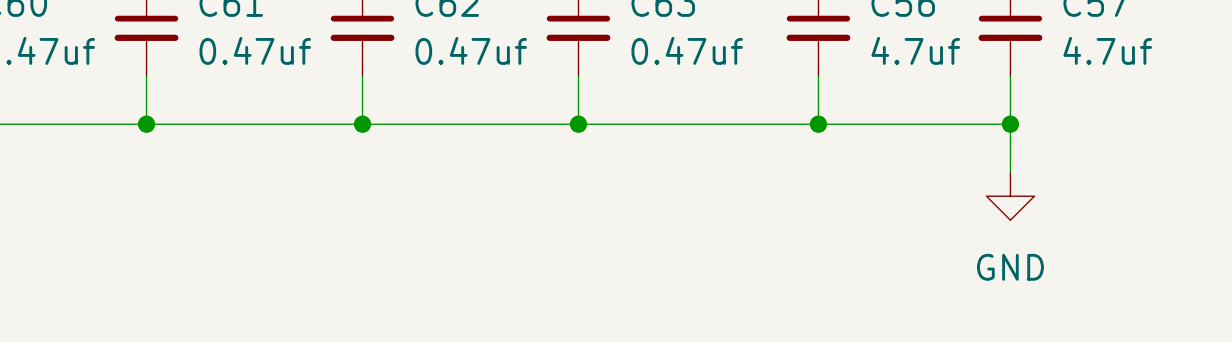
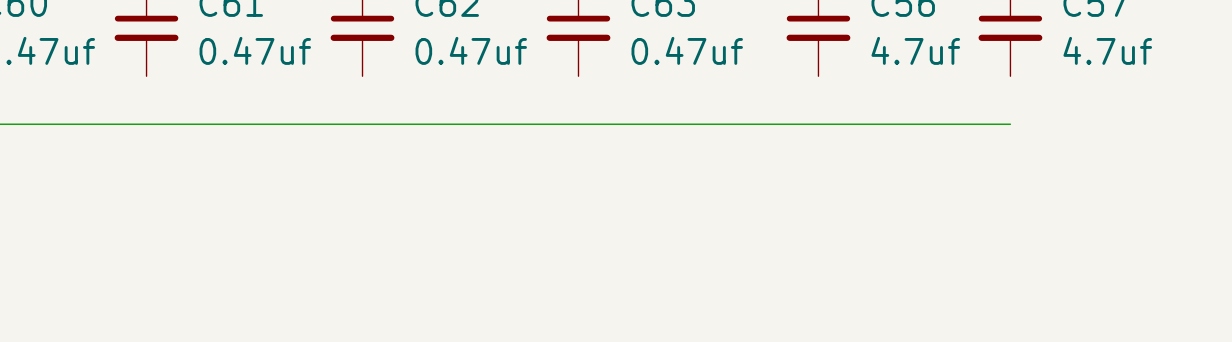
wire: (146, 76) (146, 124) -> none
wire: (362, 76) (362, 124) -> none
wire: (578, 76) (578, 124) -> none
wire: (818, 76) (818, 124) -> none
wire: (1010, 76) (1010, 172) -> none
junction: (146, 124) -> none
junction: (362, 124) -> none
junction: (578, 124) -> none
junction: (818, 124) -> none
junction: (1010, 124) -> none
power symbol: GND (1010, 196) -> none

